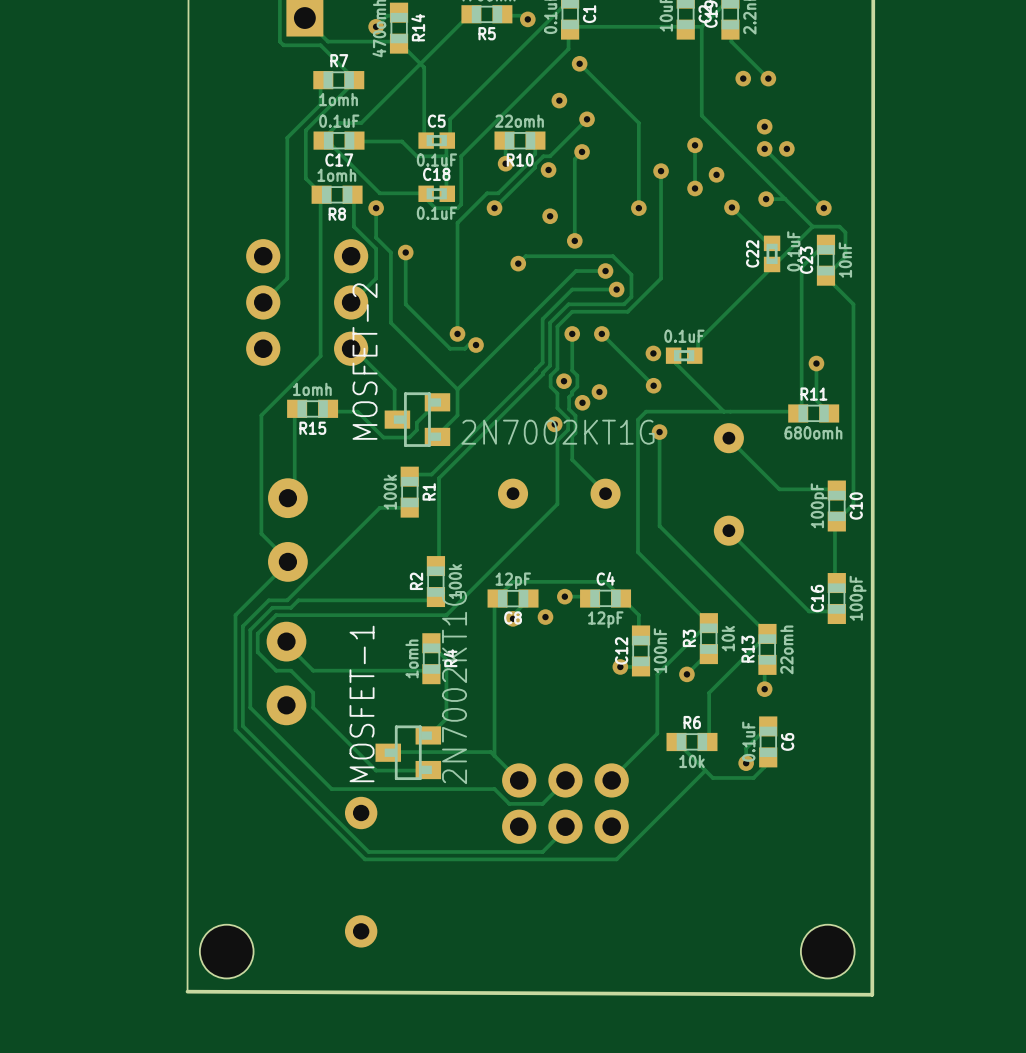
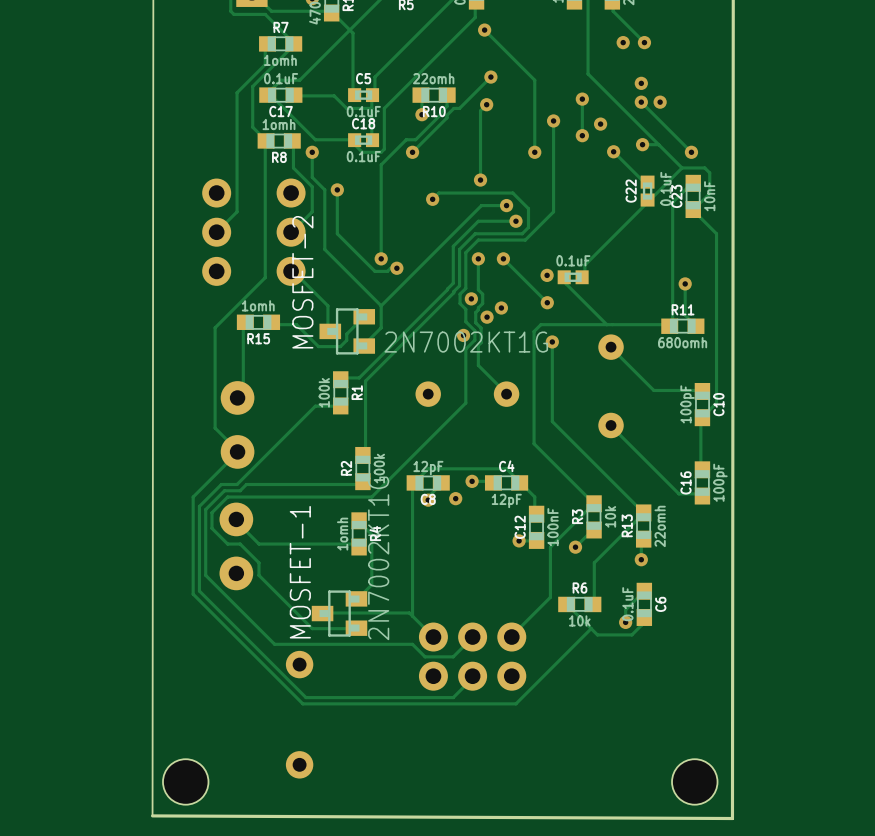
via: (559, 100) -> none
via: (548, 169) -> none
via: (550, 216) -> none

